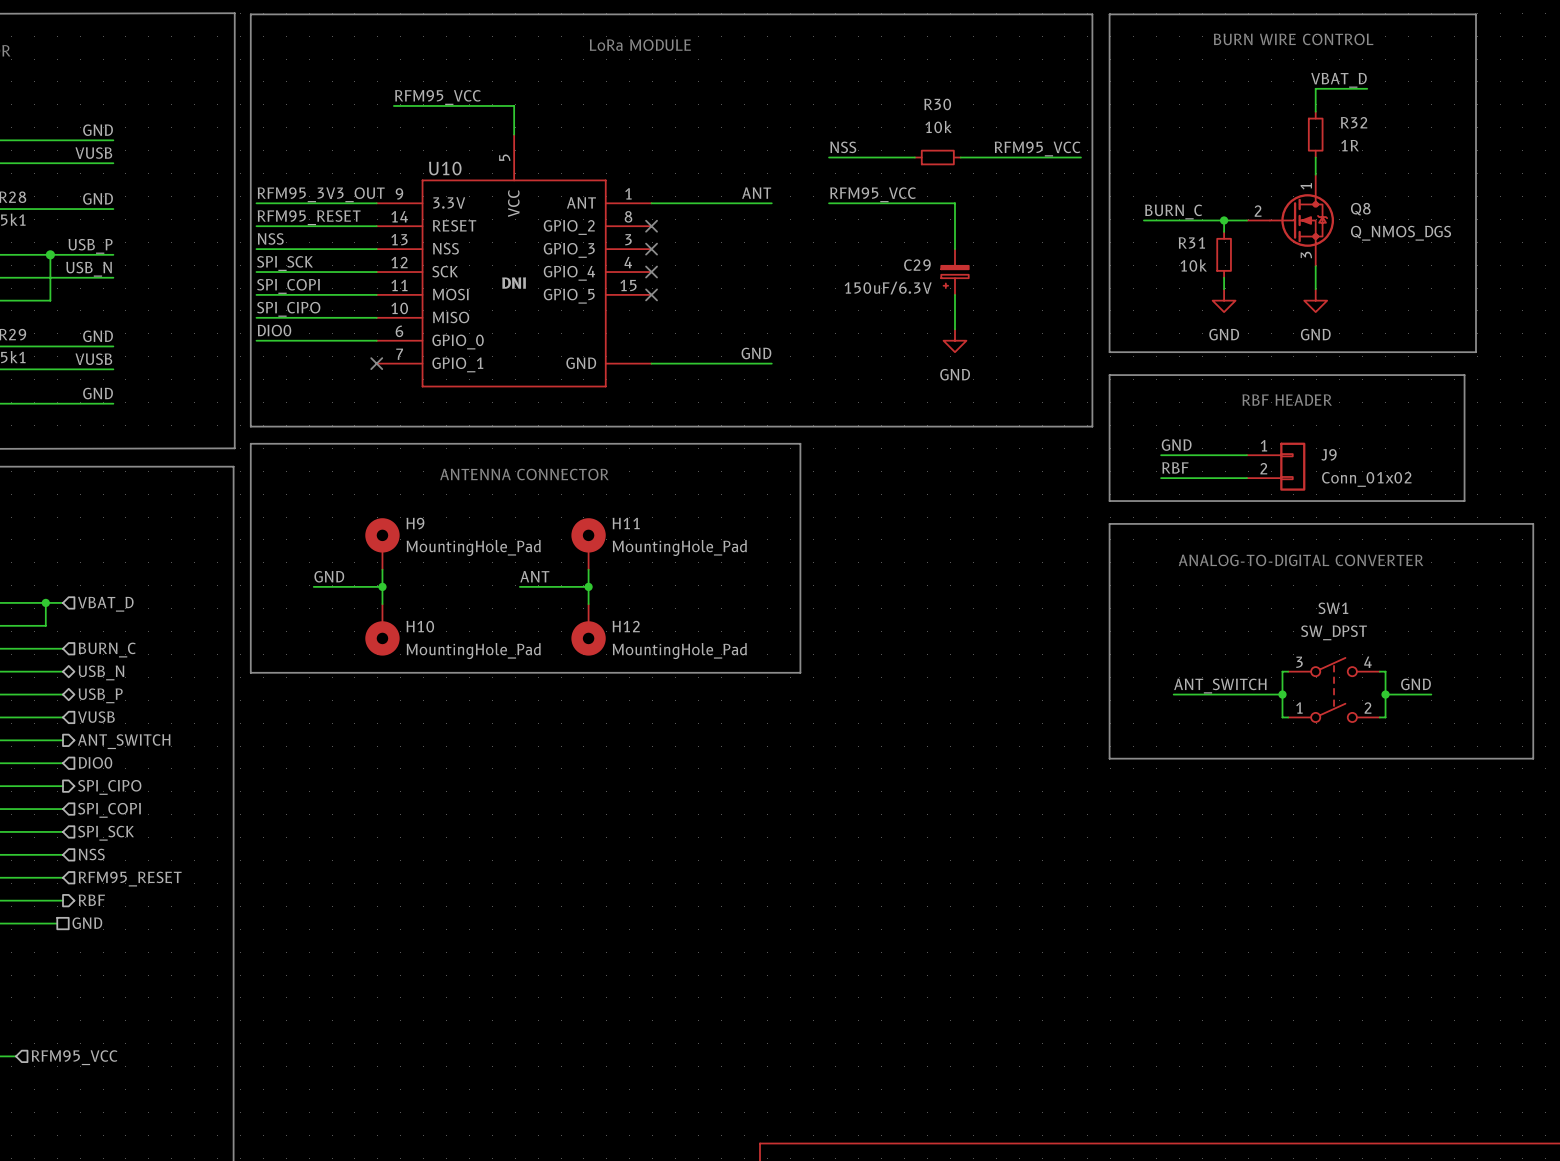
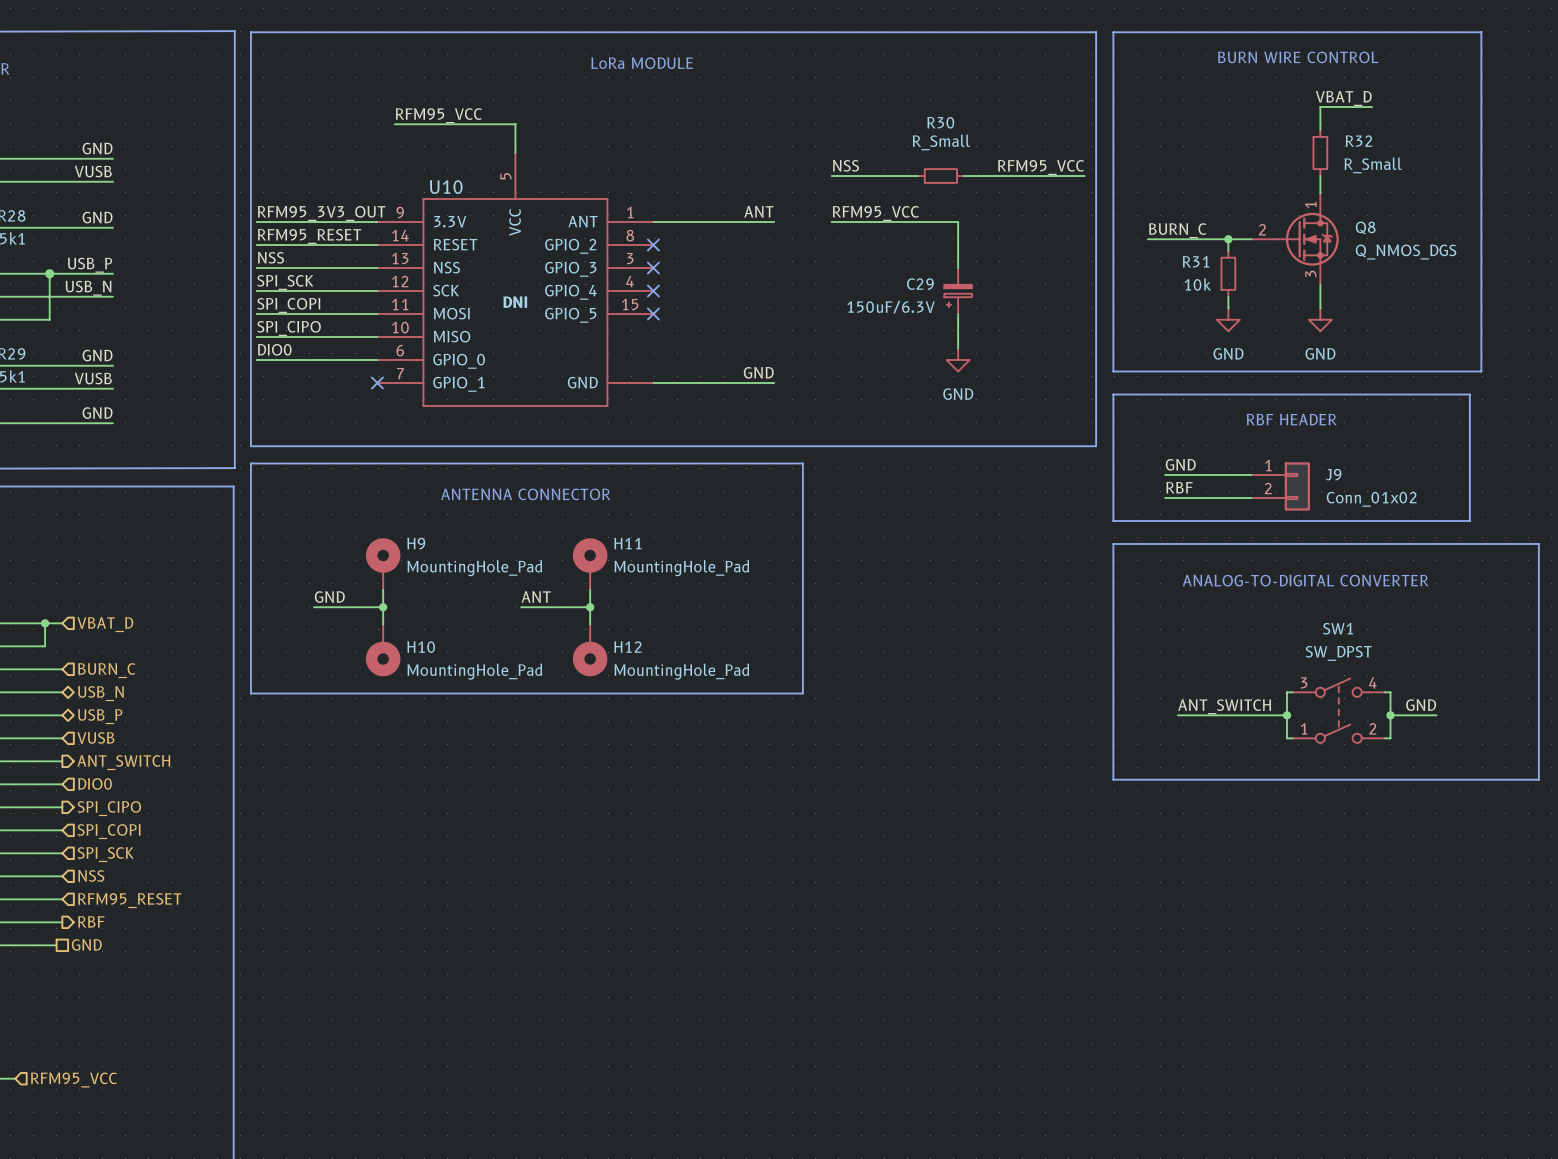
R30 value: 10k (938, 126) -> R_Small (941, 142)
R32 value: 1R (1350, 145) -> R_Small (1373, 165)

